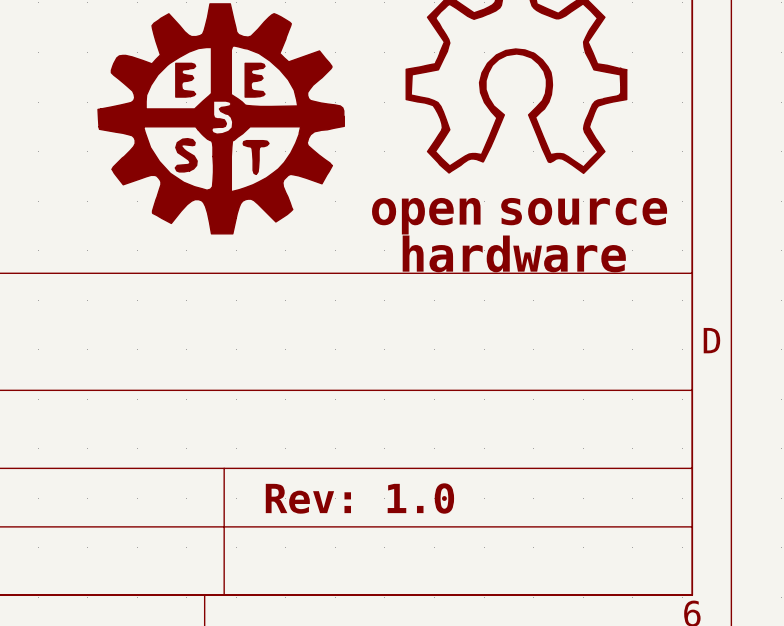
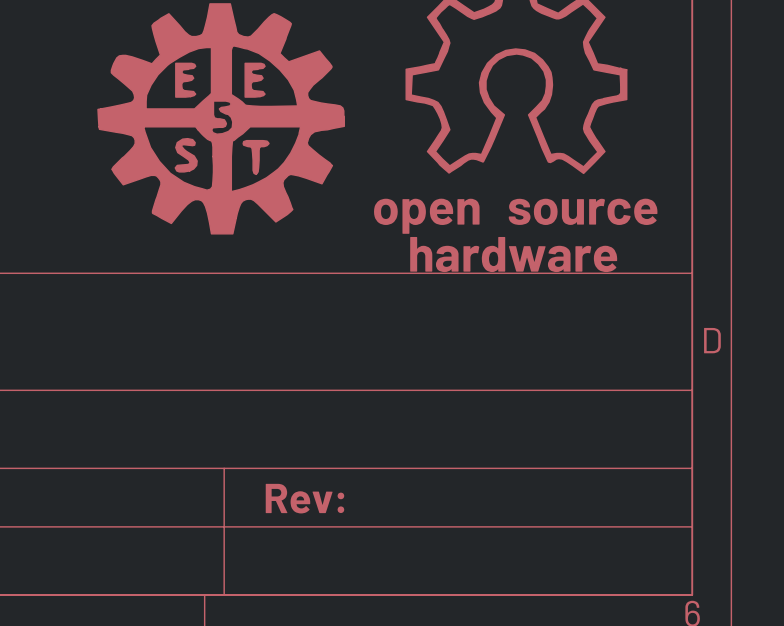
title block: Rev: 1.0 (359, 498) -> Rev: (304, 498)

